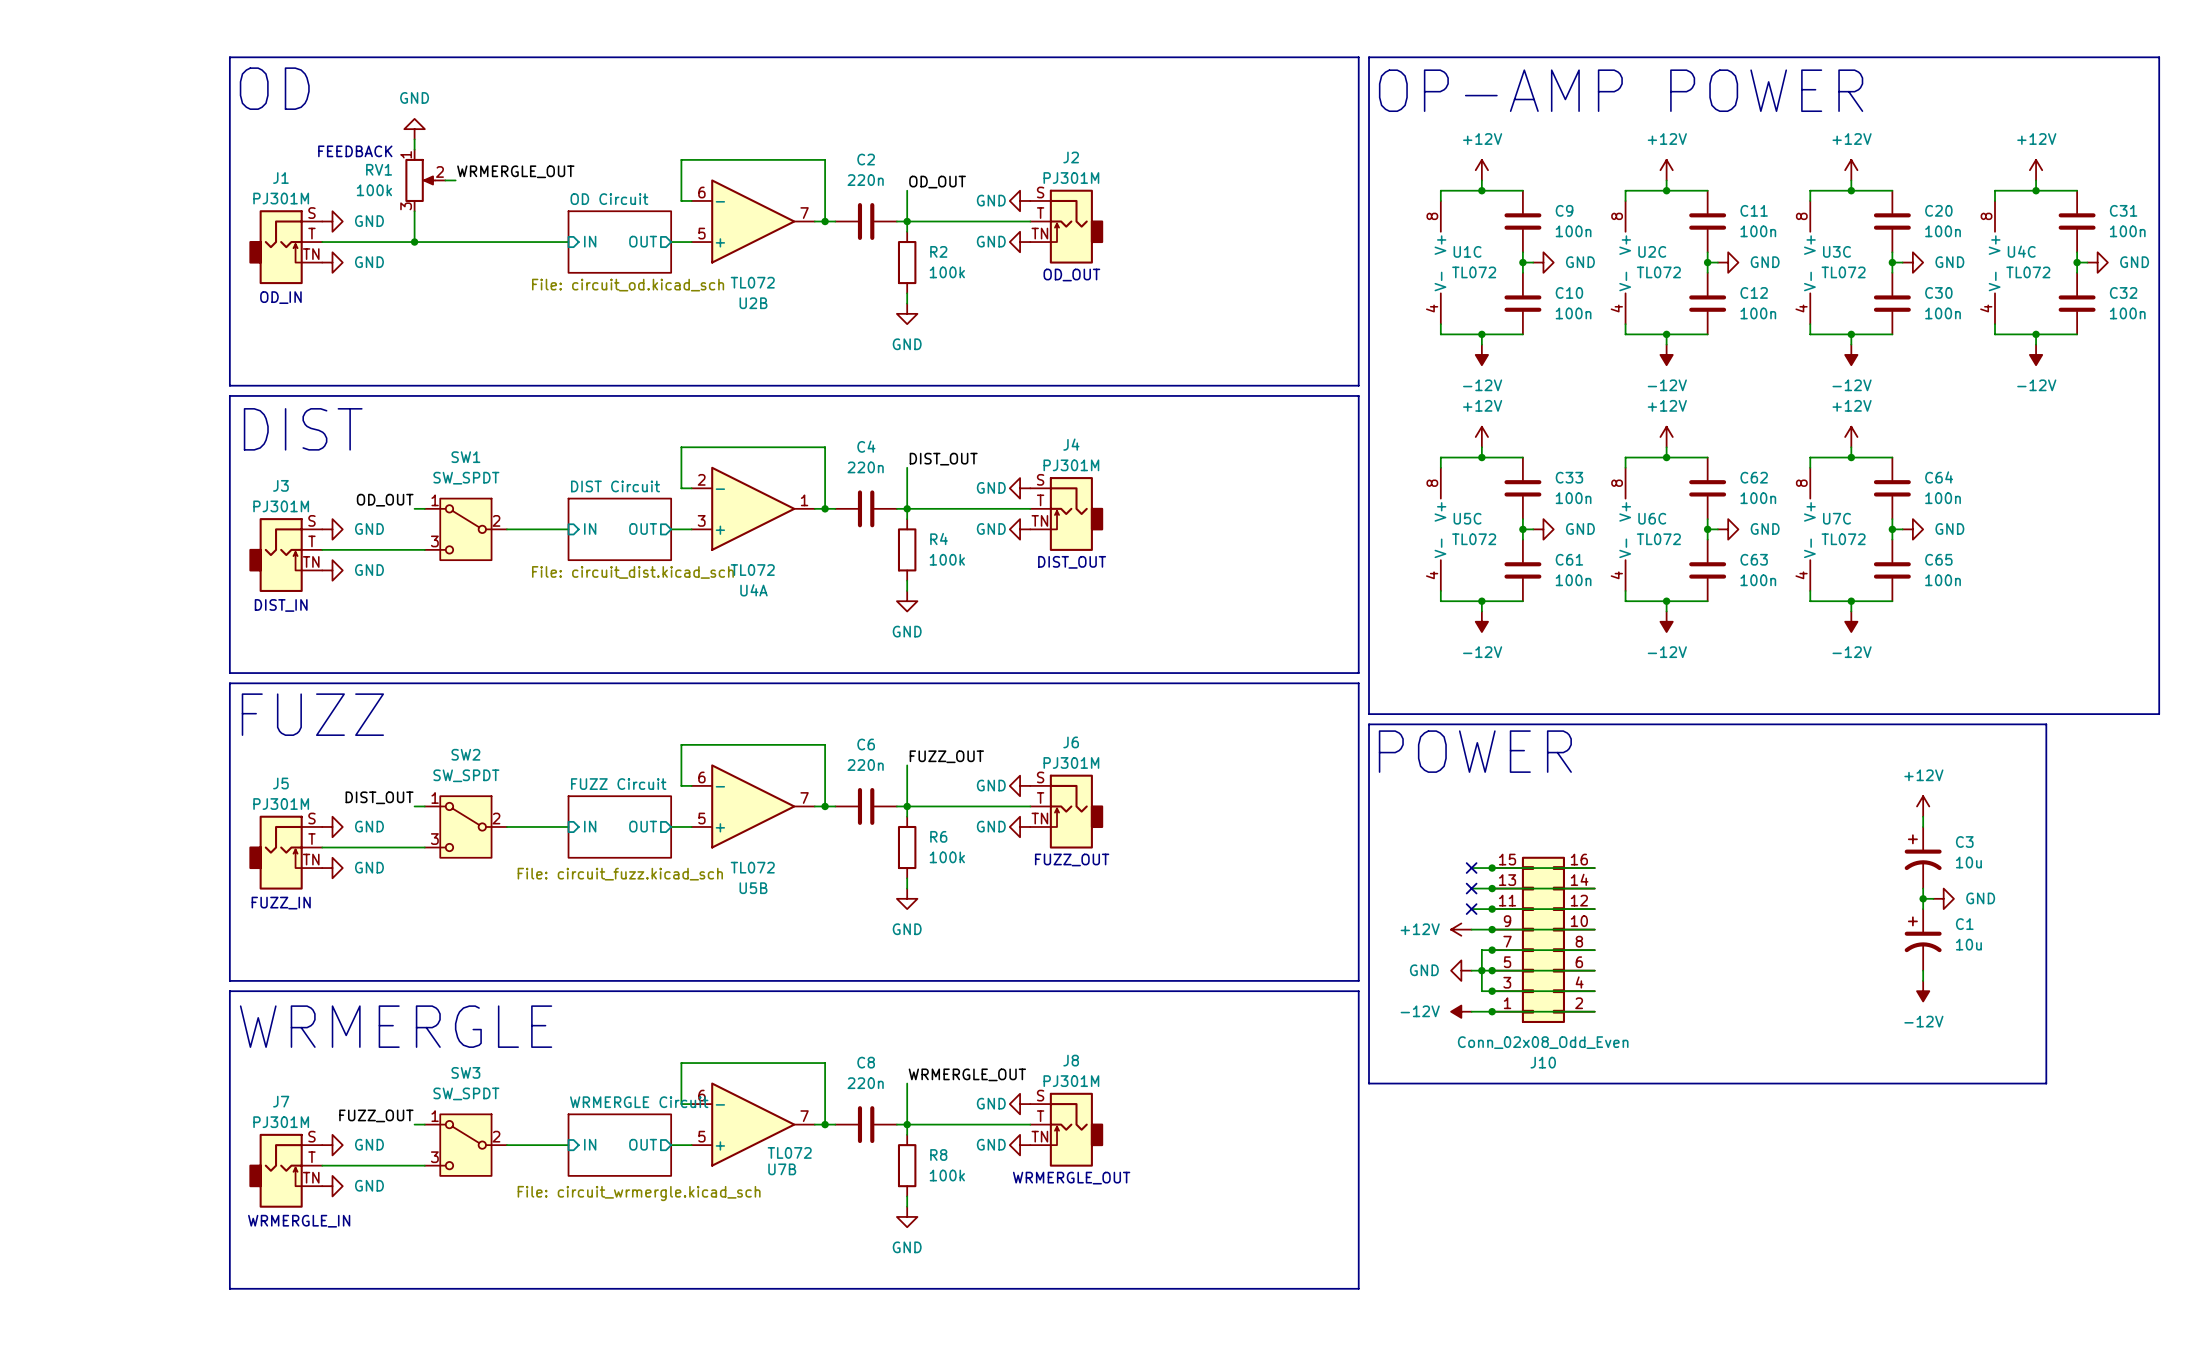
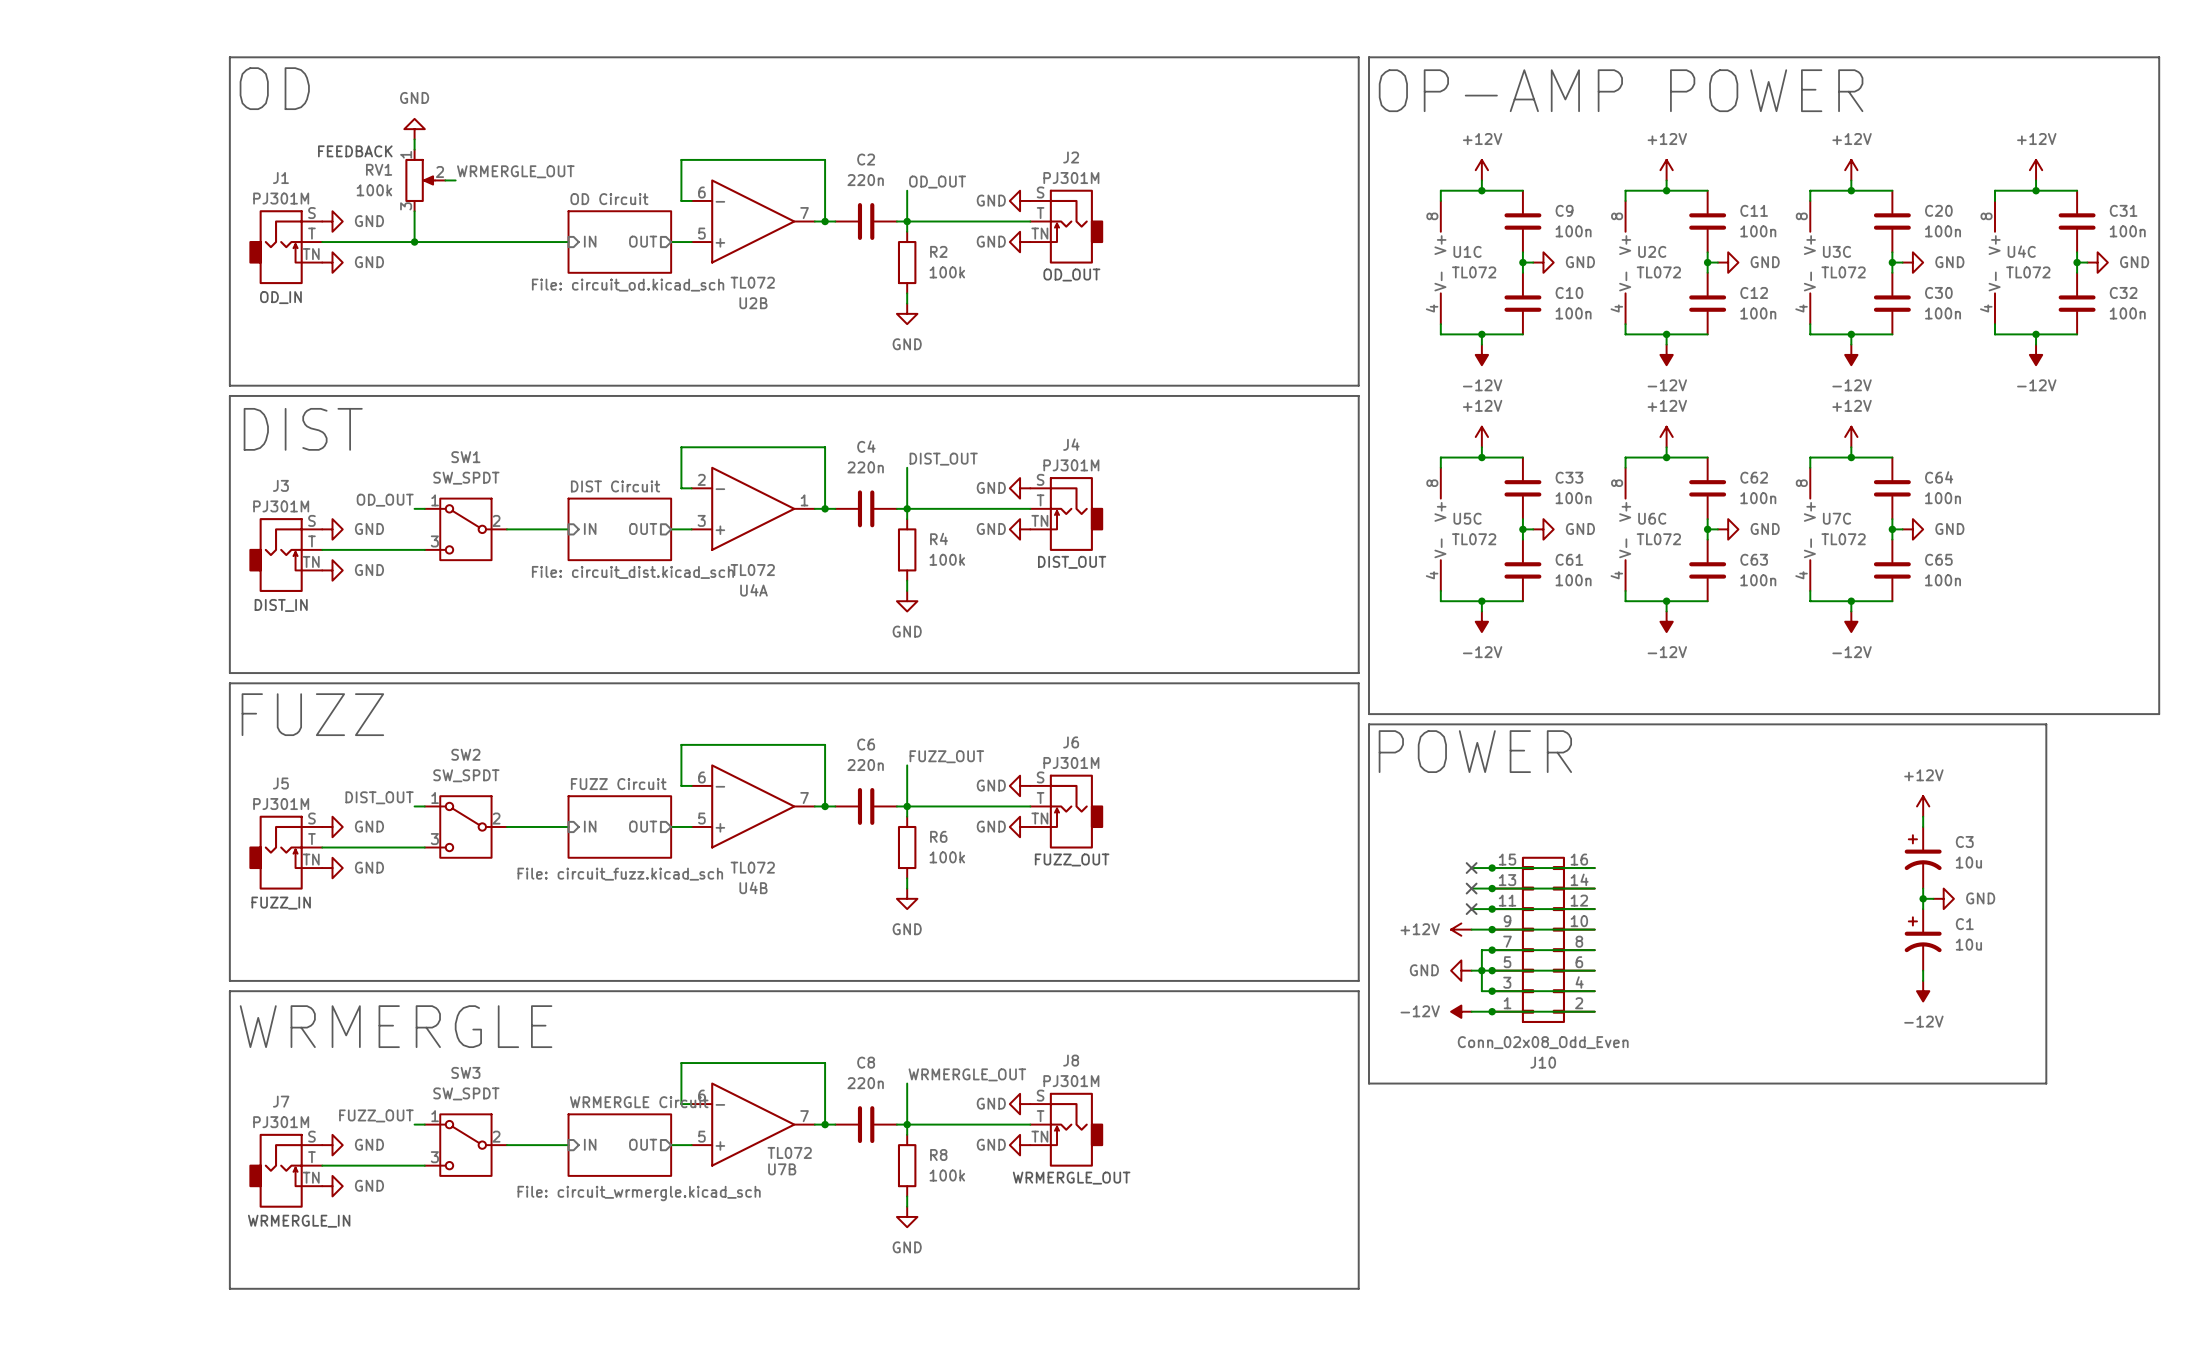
U5B name: U5B (753, 888) -> U4B (753, 887)

